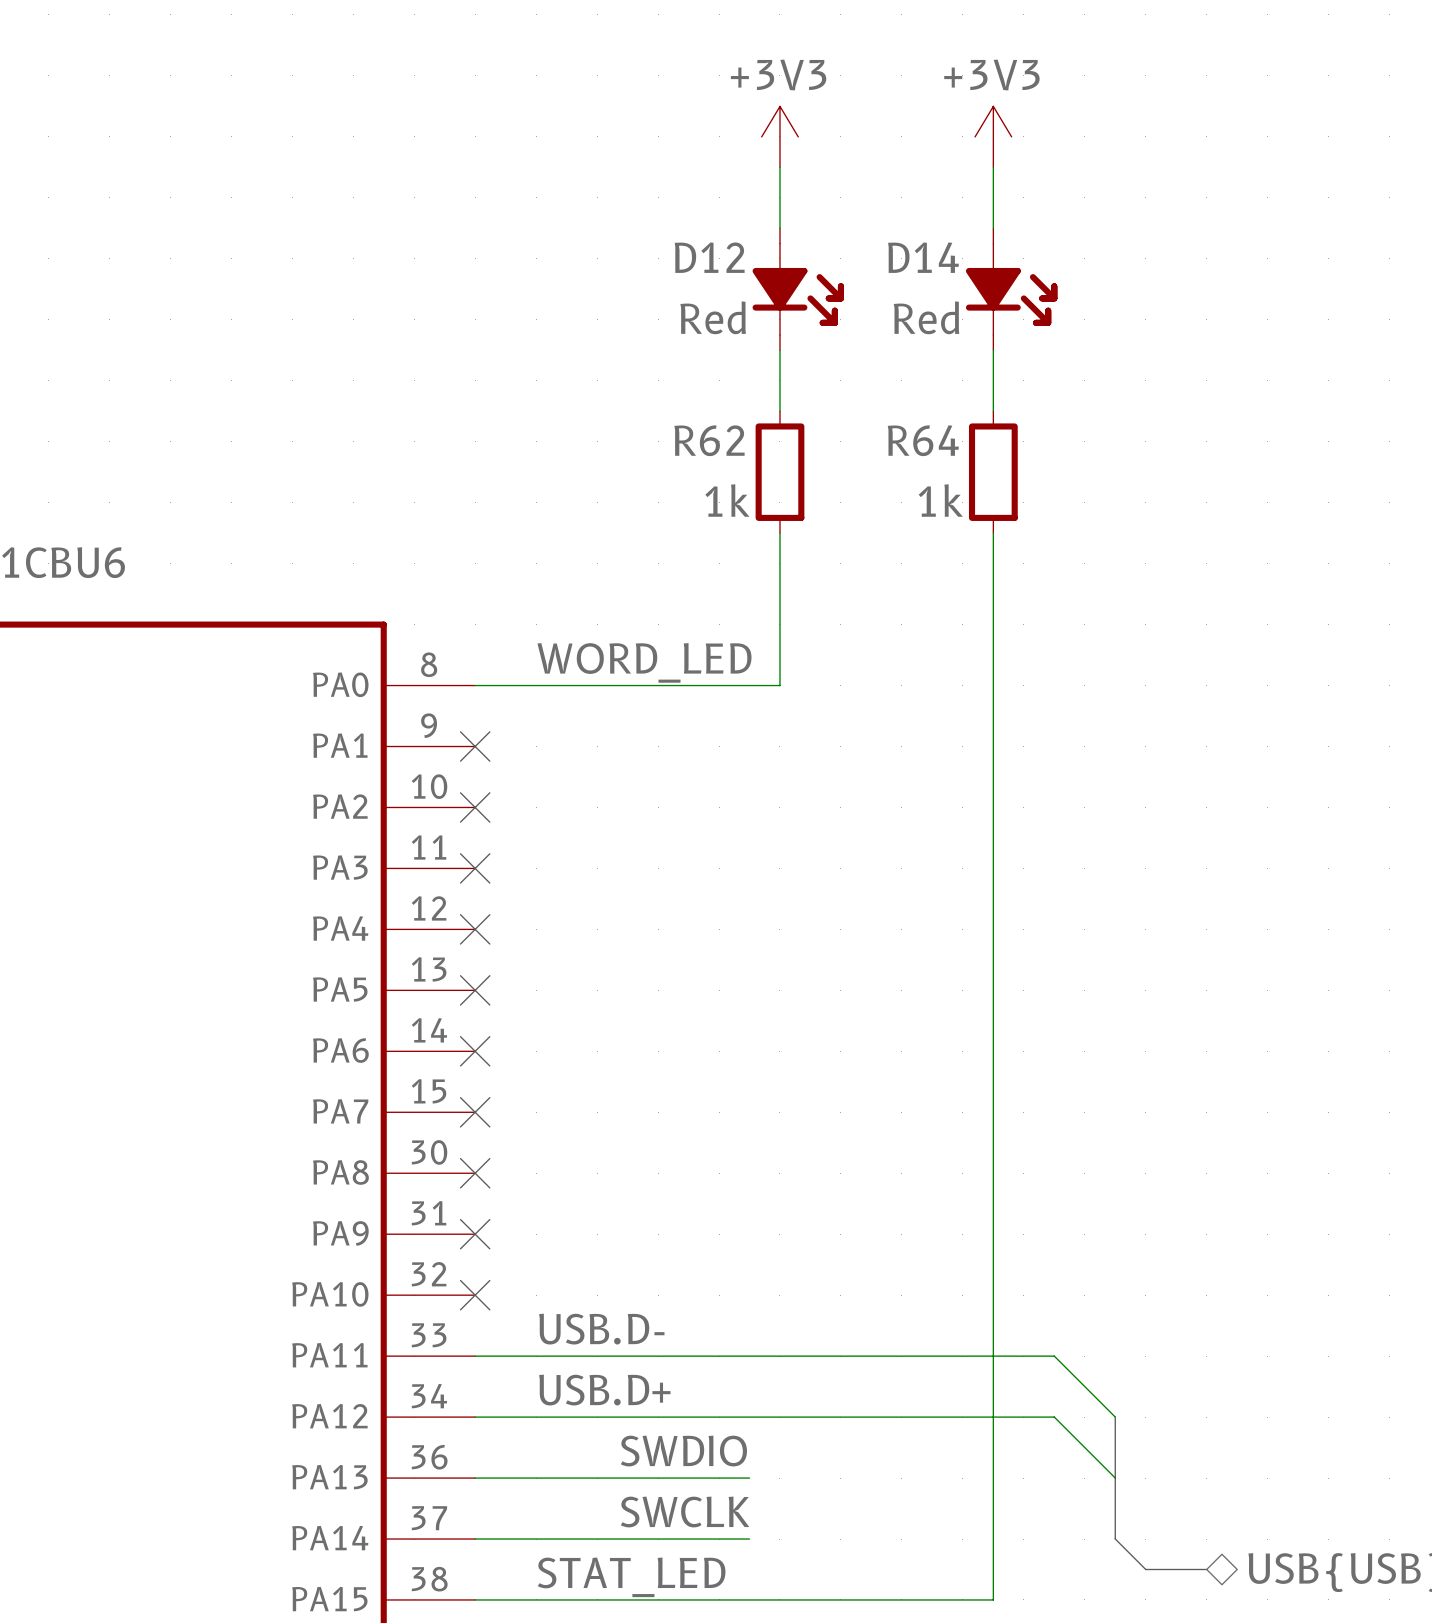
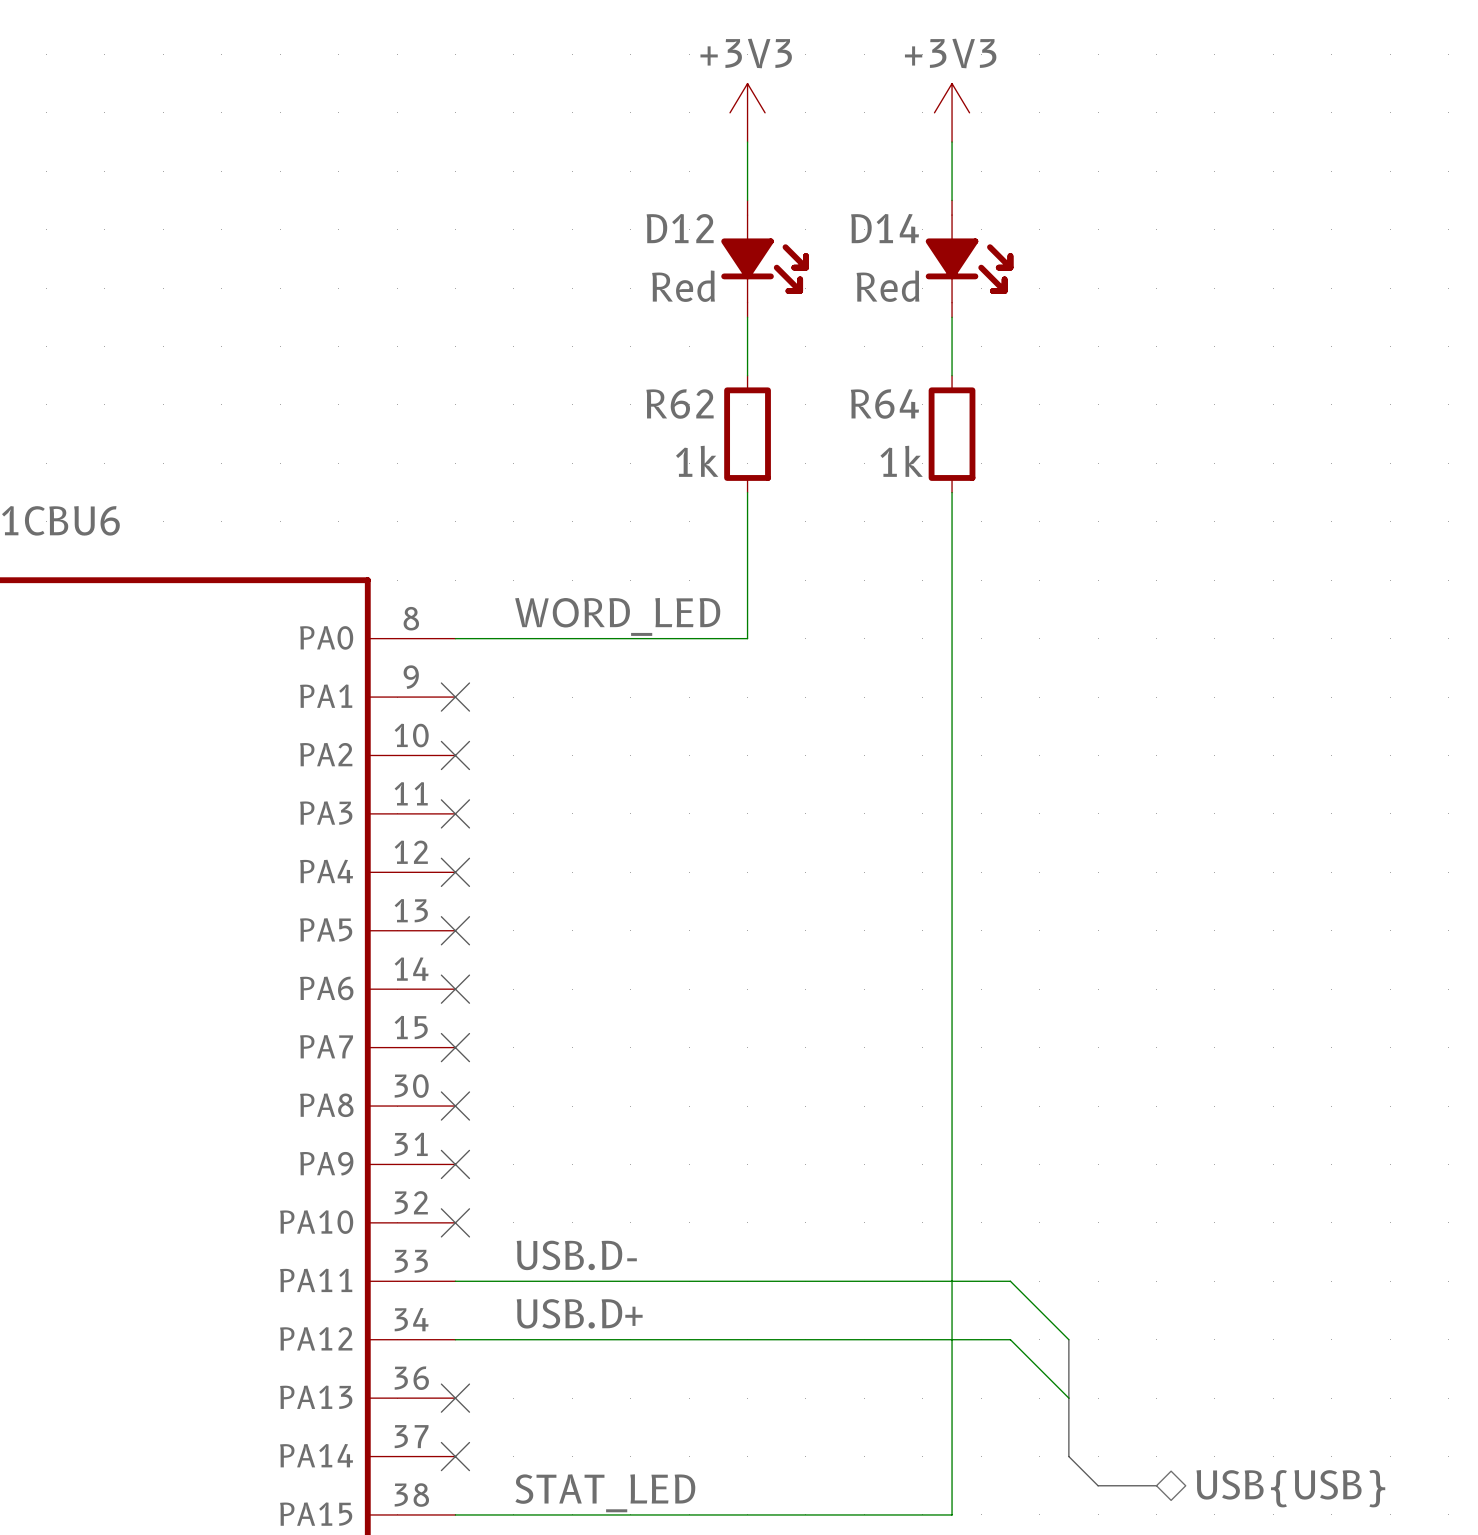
label: SWDIO (683, 1451) -> none
wire: (475, 1478) (749, 1478) -> none
no-connect mark: none -> (455, 1398)
label: SWCLK (685, 1511) -> none
wire: (475, 1539) (749, 1539) -> none
no-connect mark: none -> (455, 1456)

